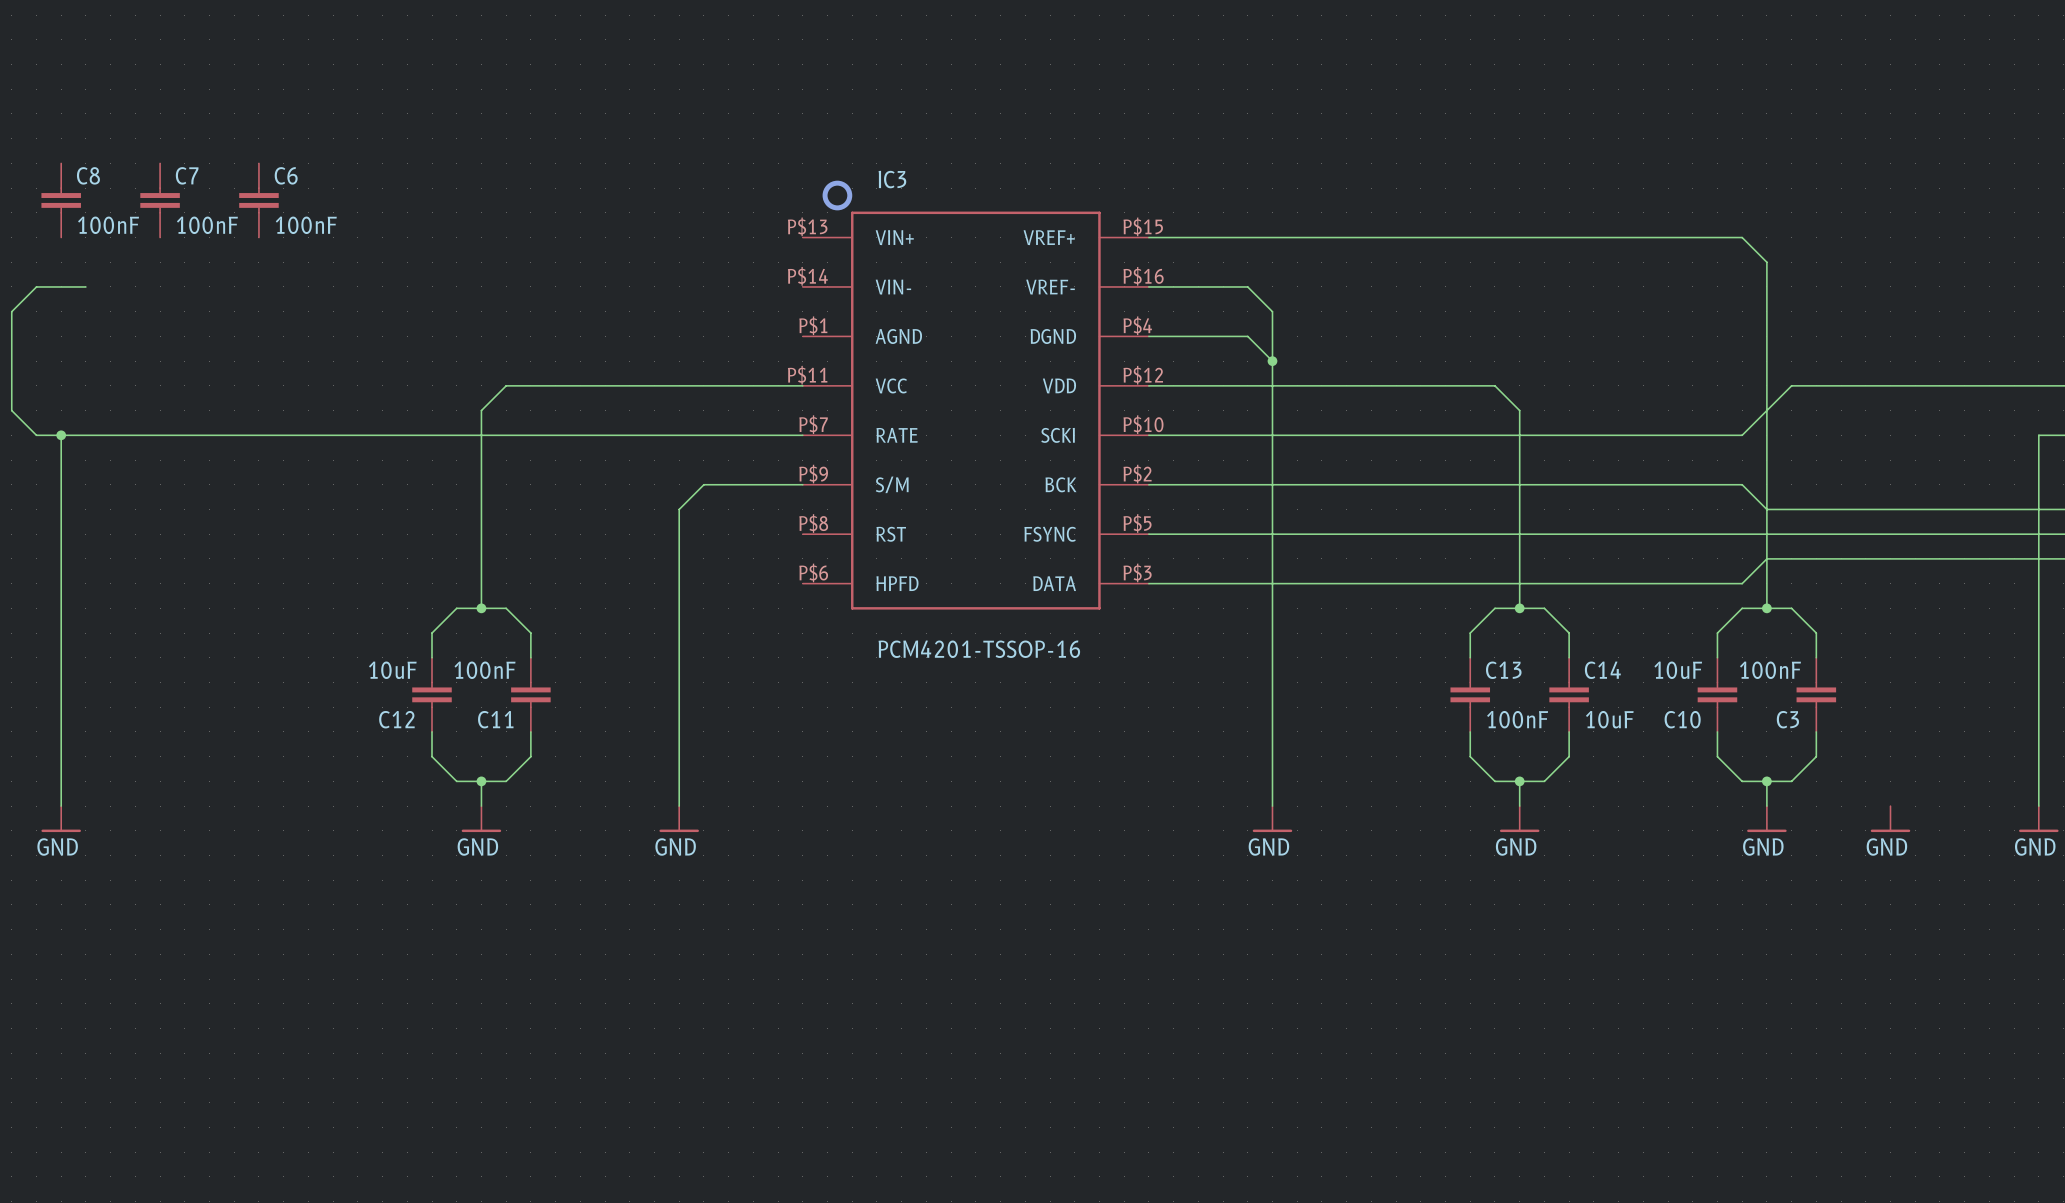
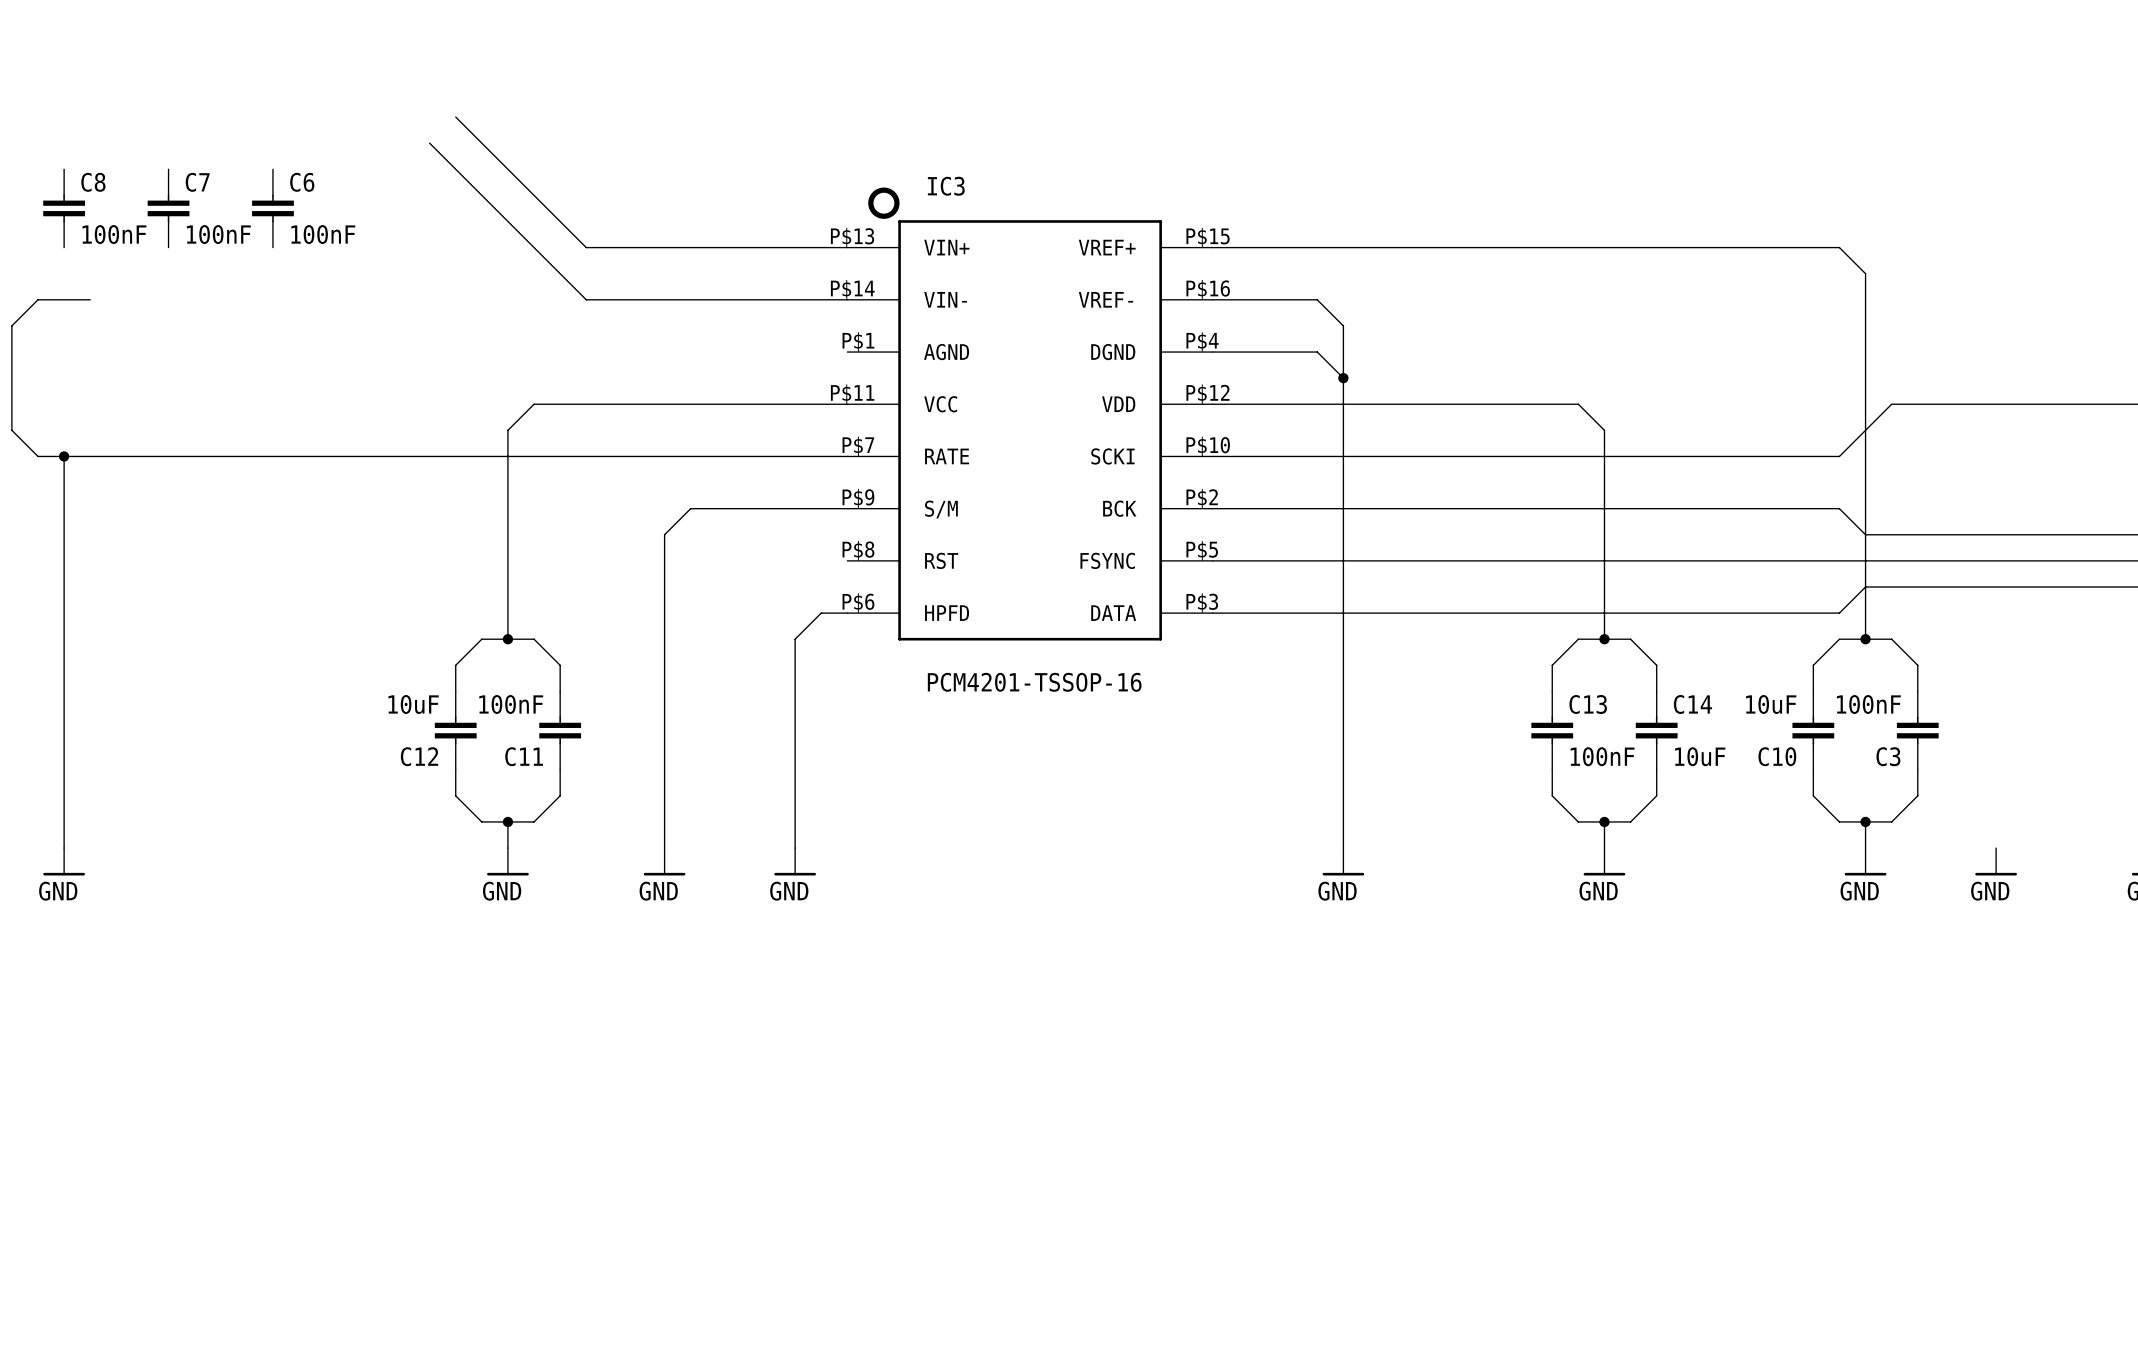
wire: none -> (455, 117) (586, 247) (847, 247)
wire: none -> (429, 143) (586, 299) (847, 299)
wire: (703, 484) (679, 509) (679, 806) -> (742, 508) (690, 508) (664, 534) (664, 848)
wire: none -> (847, 613) (821, 613) (795, 639) (795, 848)
power symbol: none -> GND (664, 861)
power symbol: GND (679, 819) -> none
power symbol: none -> GND (795, 861)

